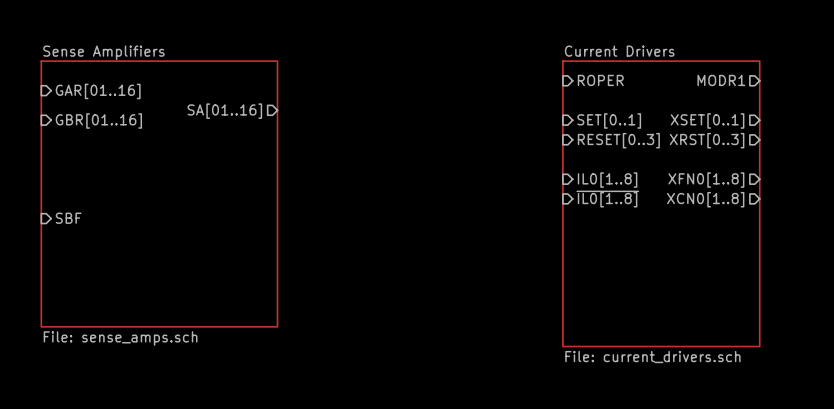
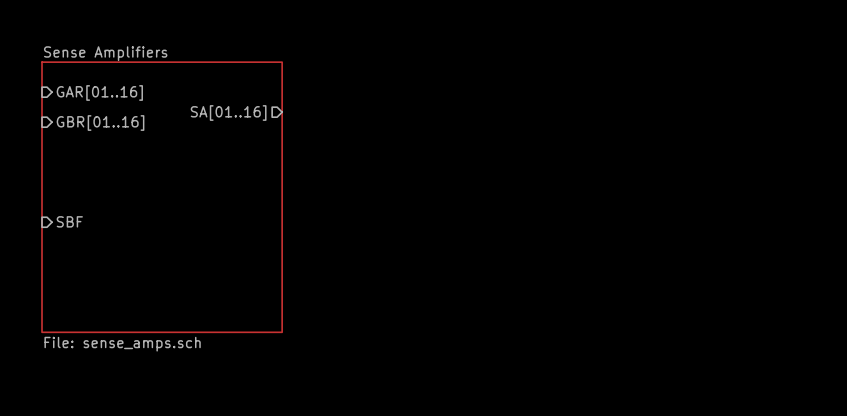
sheet pin: ROPER (600, 80) -> none
sheet pin: MODR1 (721, 80) -> none
sheet pin: SET[0..1] (609, 120) -> none
sheet pin: XSET[0..1] (707, 120) -> none
sheet pin: RESET[0..3] (618, 140) -> none
sheet pin: XRST[0..3] (707, 140) -> none
sheet pin: IL0[1..8] (607, 180) -> none
sheet pin: XFN0[1..8] (706, 180) -> none
sheet pin: ~{IL0[1..8]} (607, 199) -> none
sheet pin: XCN0[1..8] (705, 199) -> none
sheet Current Drivers: File: current_drivers.sch (661, 203) -> none

